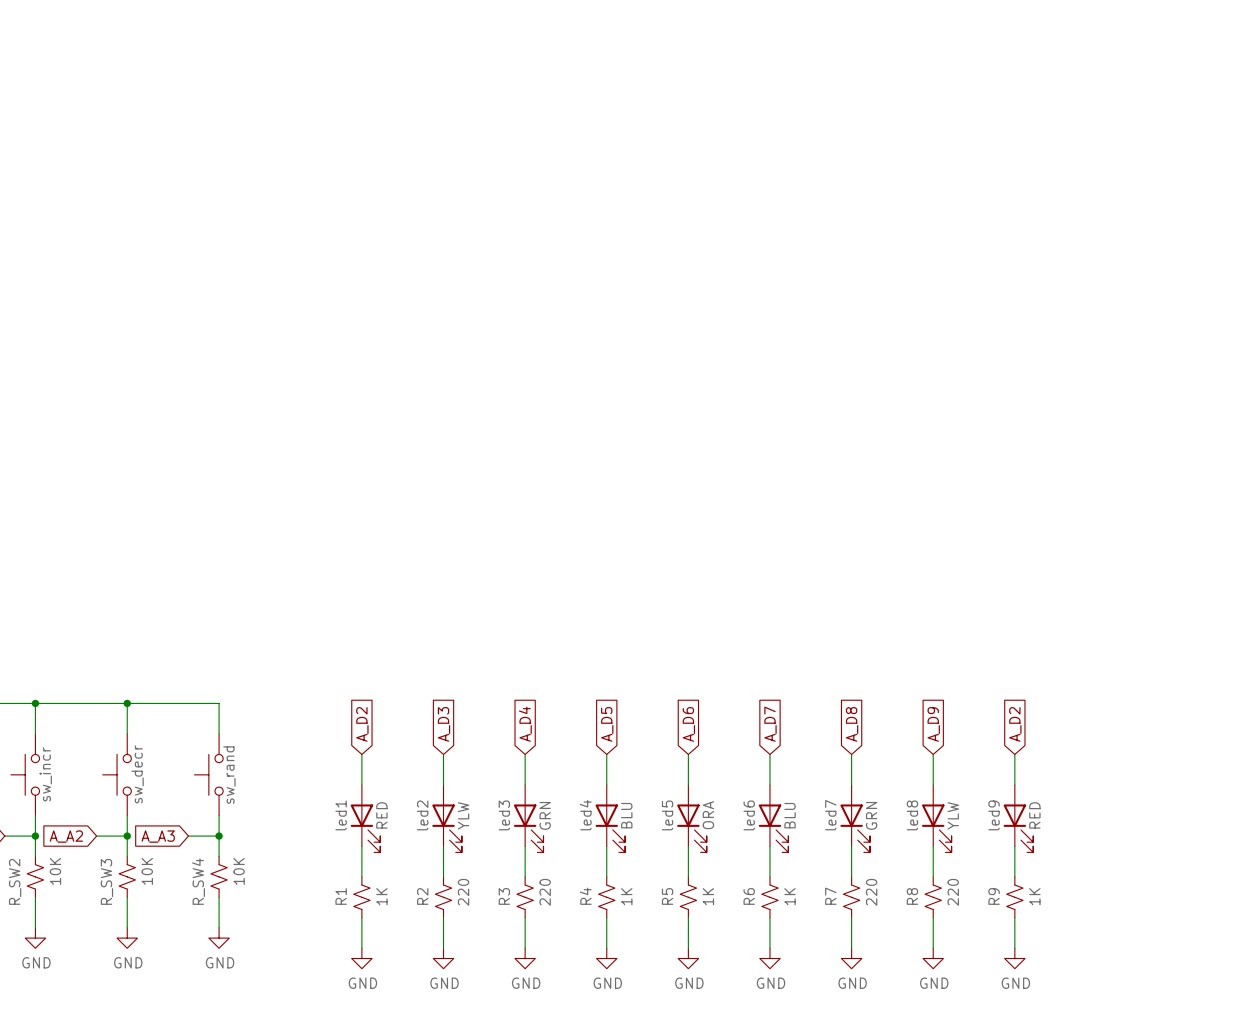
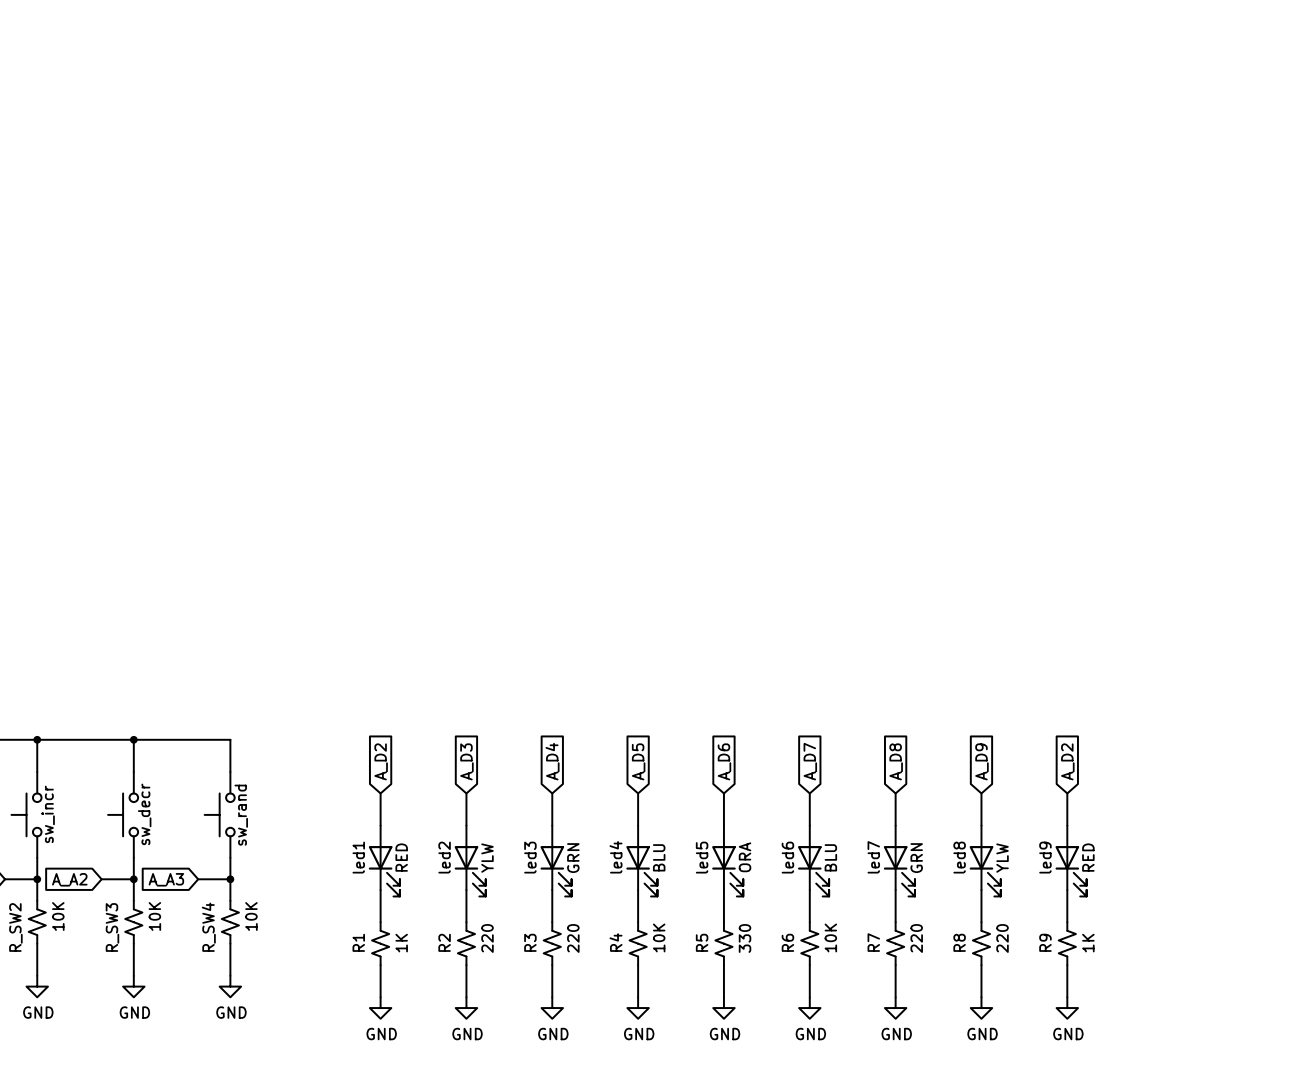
R4 value: 1K (626, 896) -> 10K (659, 937)
R5 value: 1K (708, 896) -> 330 (745, 938)
R6 value: 1K (790, 896) -> 10K (830, 937)

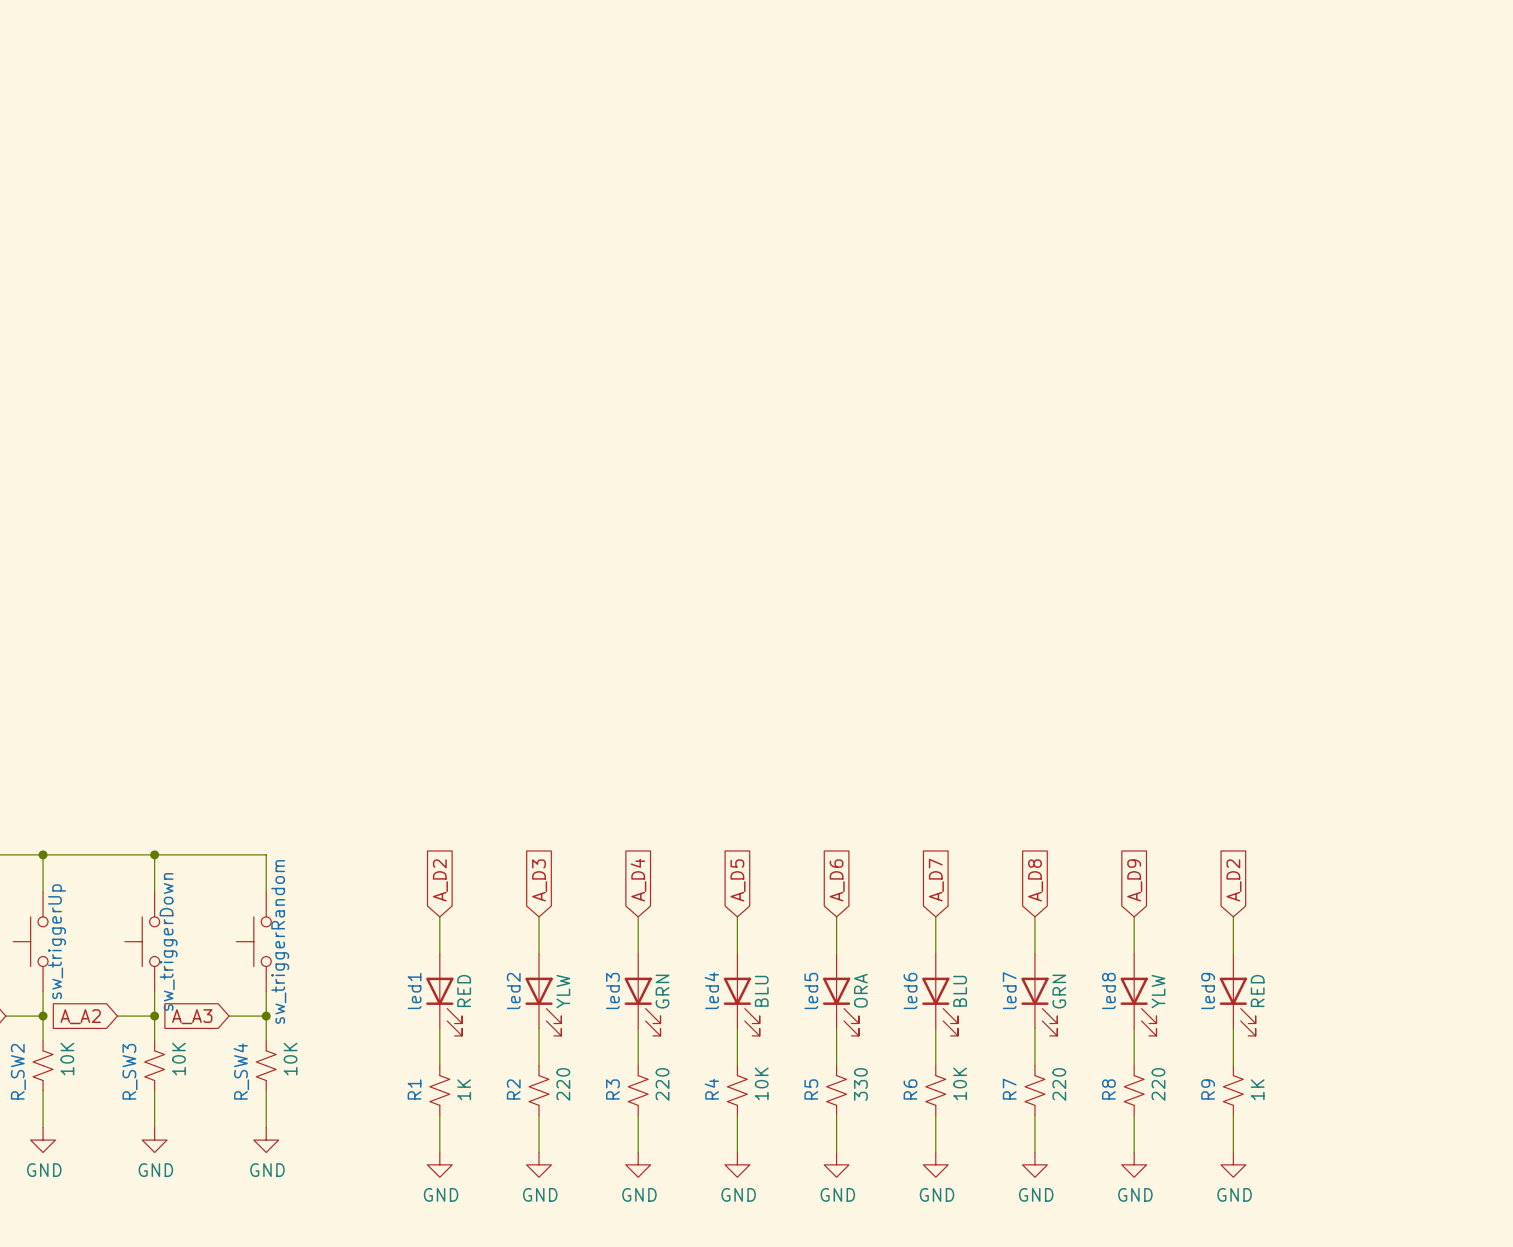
sw_incr name: sw_incr (48, 814) -> sw_triggerUp (57, 941)
sw_decr name: sw_decr (144, 814) -> sw_triggerDown (168, 941)
sw_rand name: sw_rand (241, 815) -> sw_triggerRandom (280, 941)

